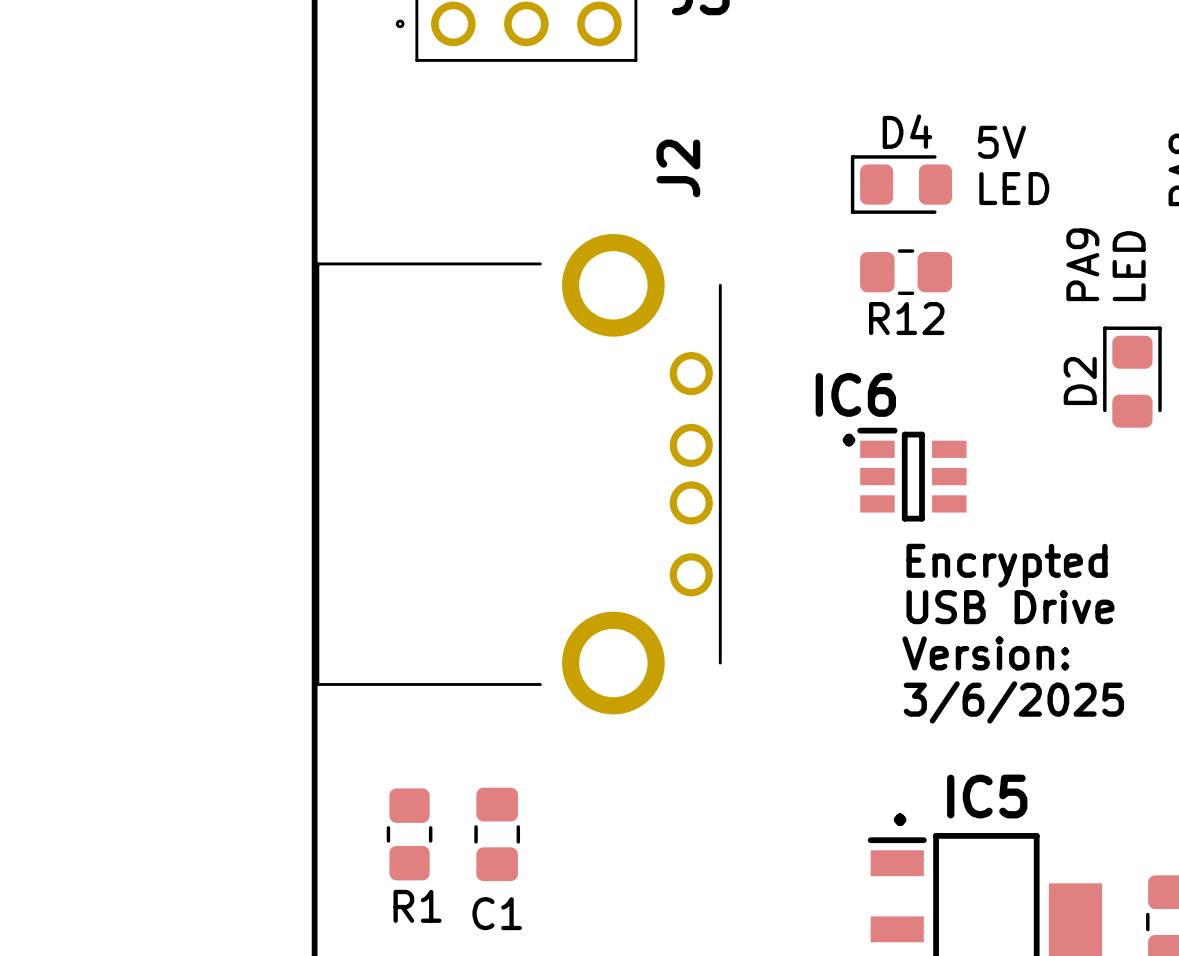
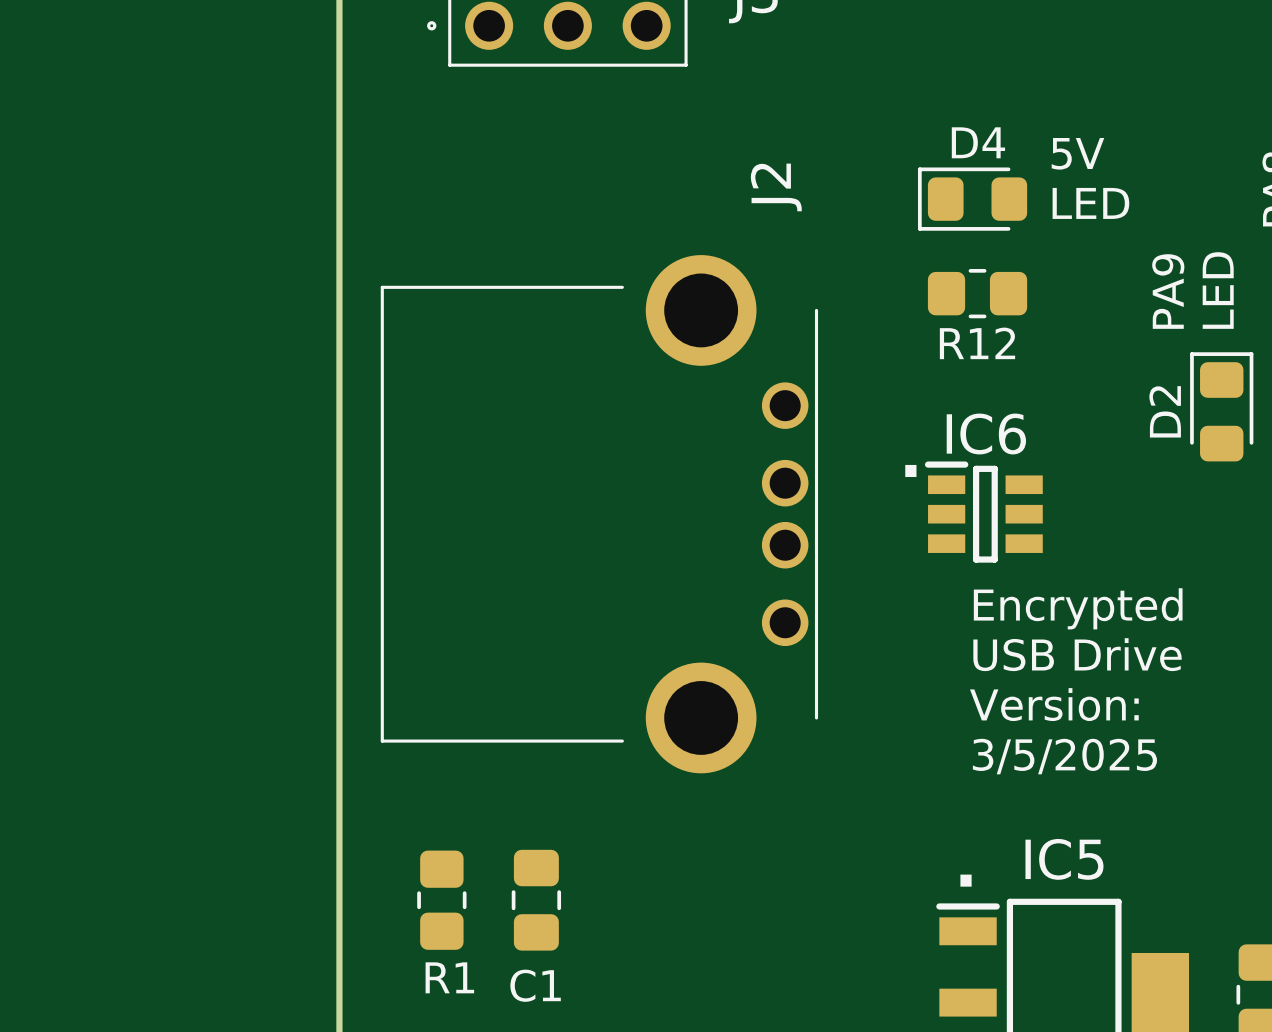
IC6 name position: IC6 (855, 394) -> IC6 (986, 433)
J2 position: (519, 474) -> (599, 514)
text: 3/6/2025 (1013, 702) -> 3/5/2025 (1064, 756)

